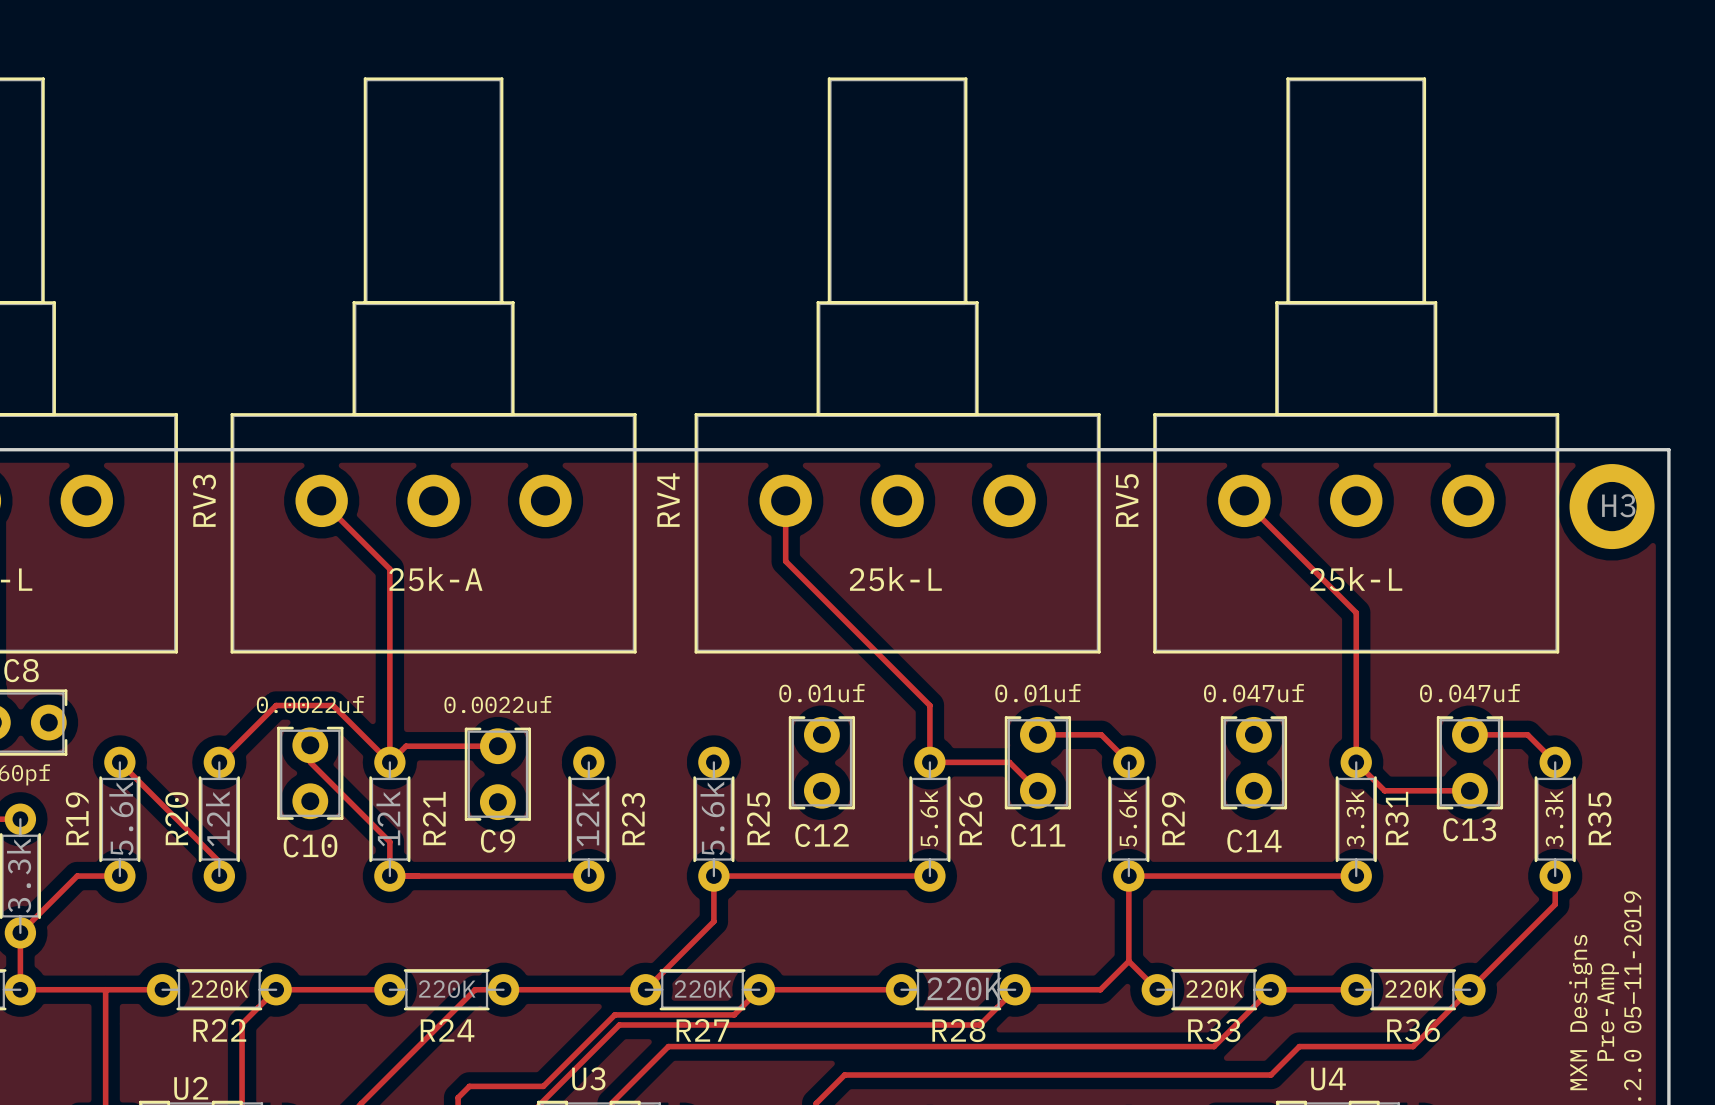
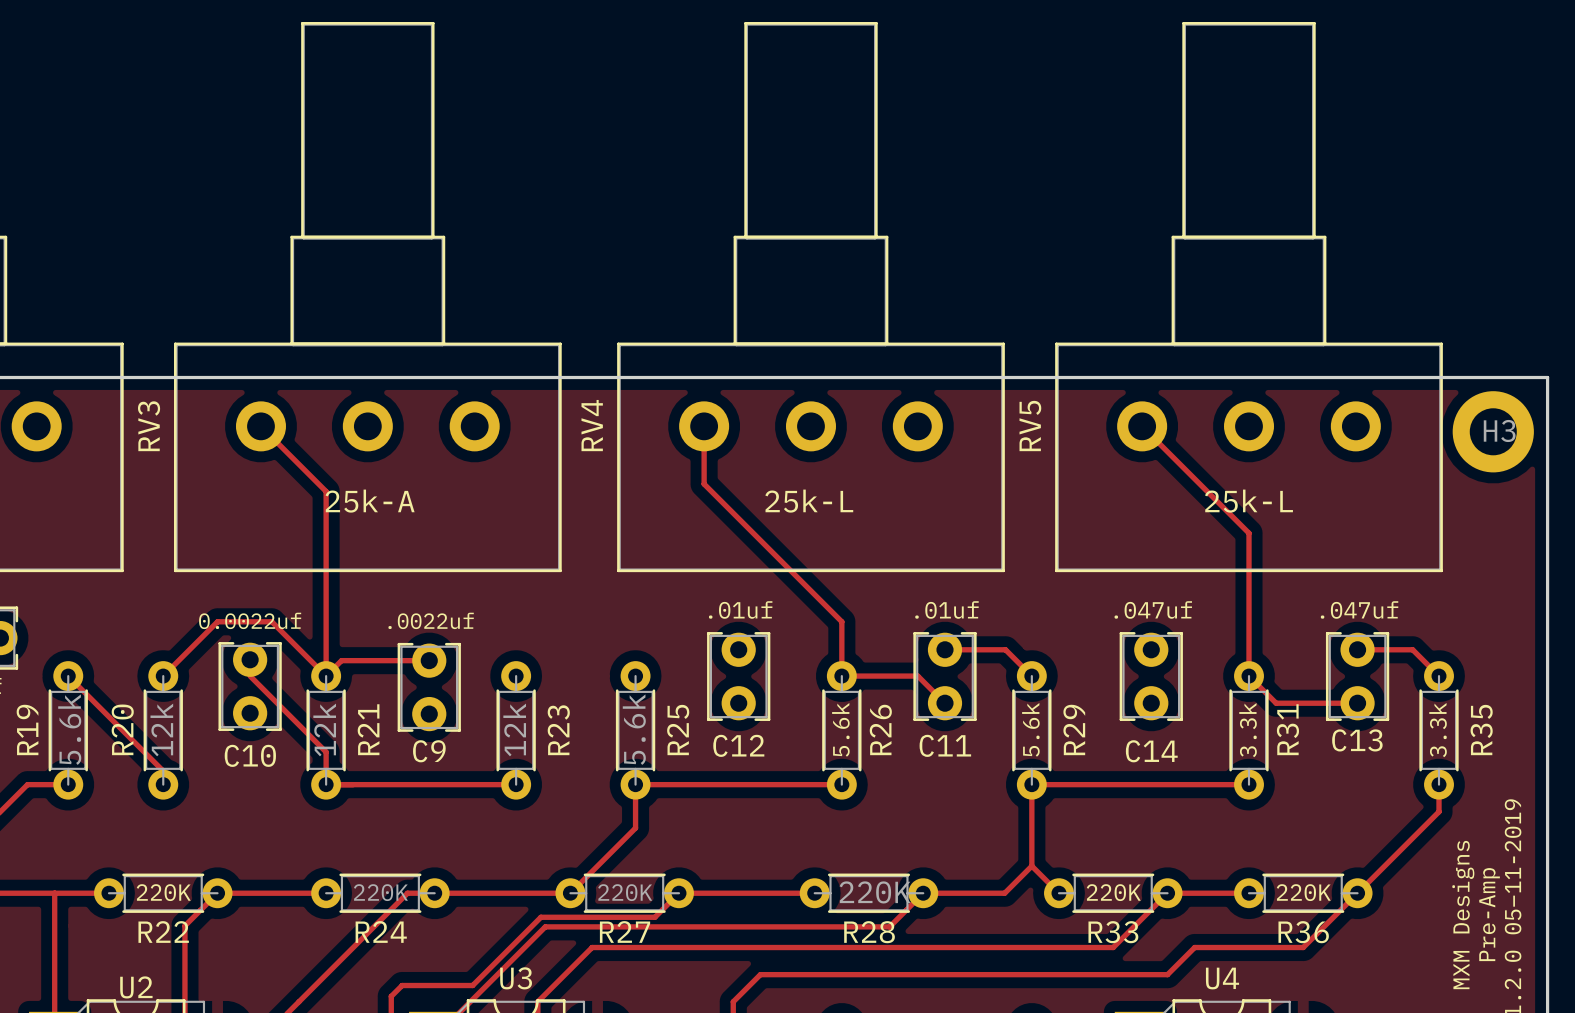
C12 value: 0.01uf (821, 693) -> .01uf (740, 609)
C11 value: 0.01uf (1037, 693) -> .01uf (946, 609)
C14 value: 0.047uf (1253, 693) -> .047uf (1153, 609)
C13 value: 0.047uf (1469, 693) -> .047uf (1359, 609)
C9 value: 0.0022uf (497, 704) -> .0022uf (431, 620)

